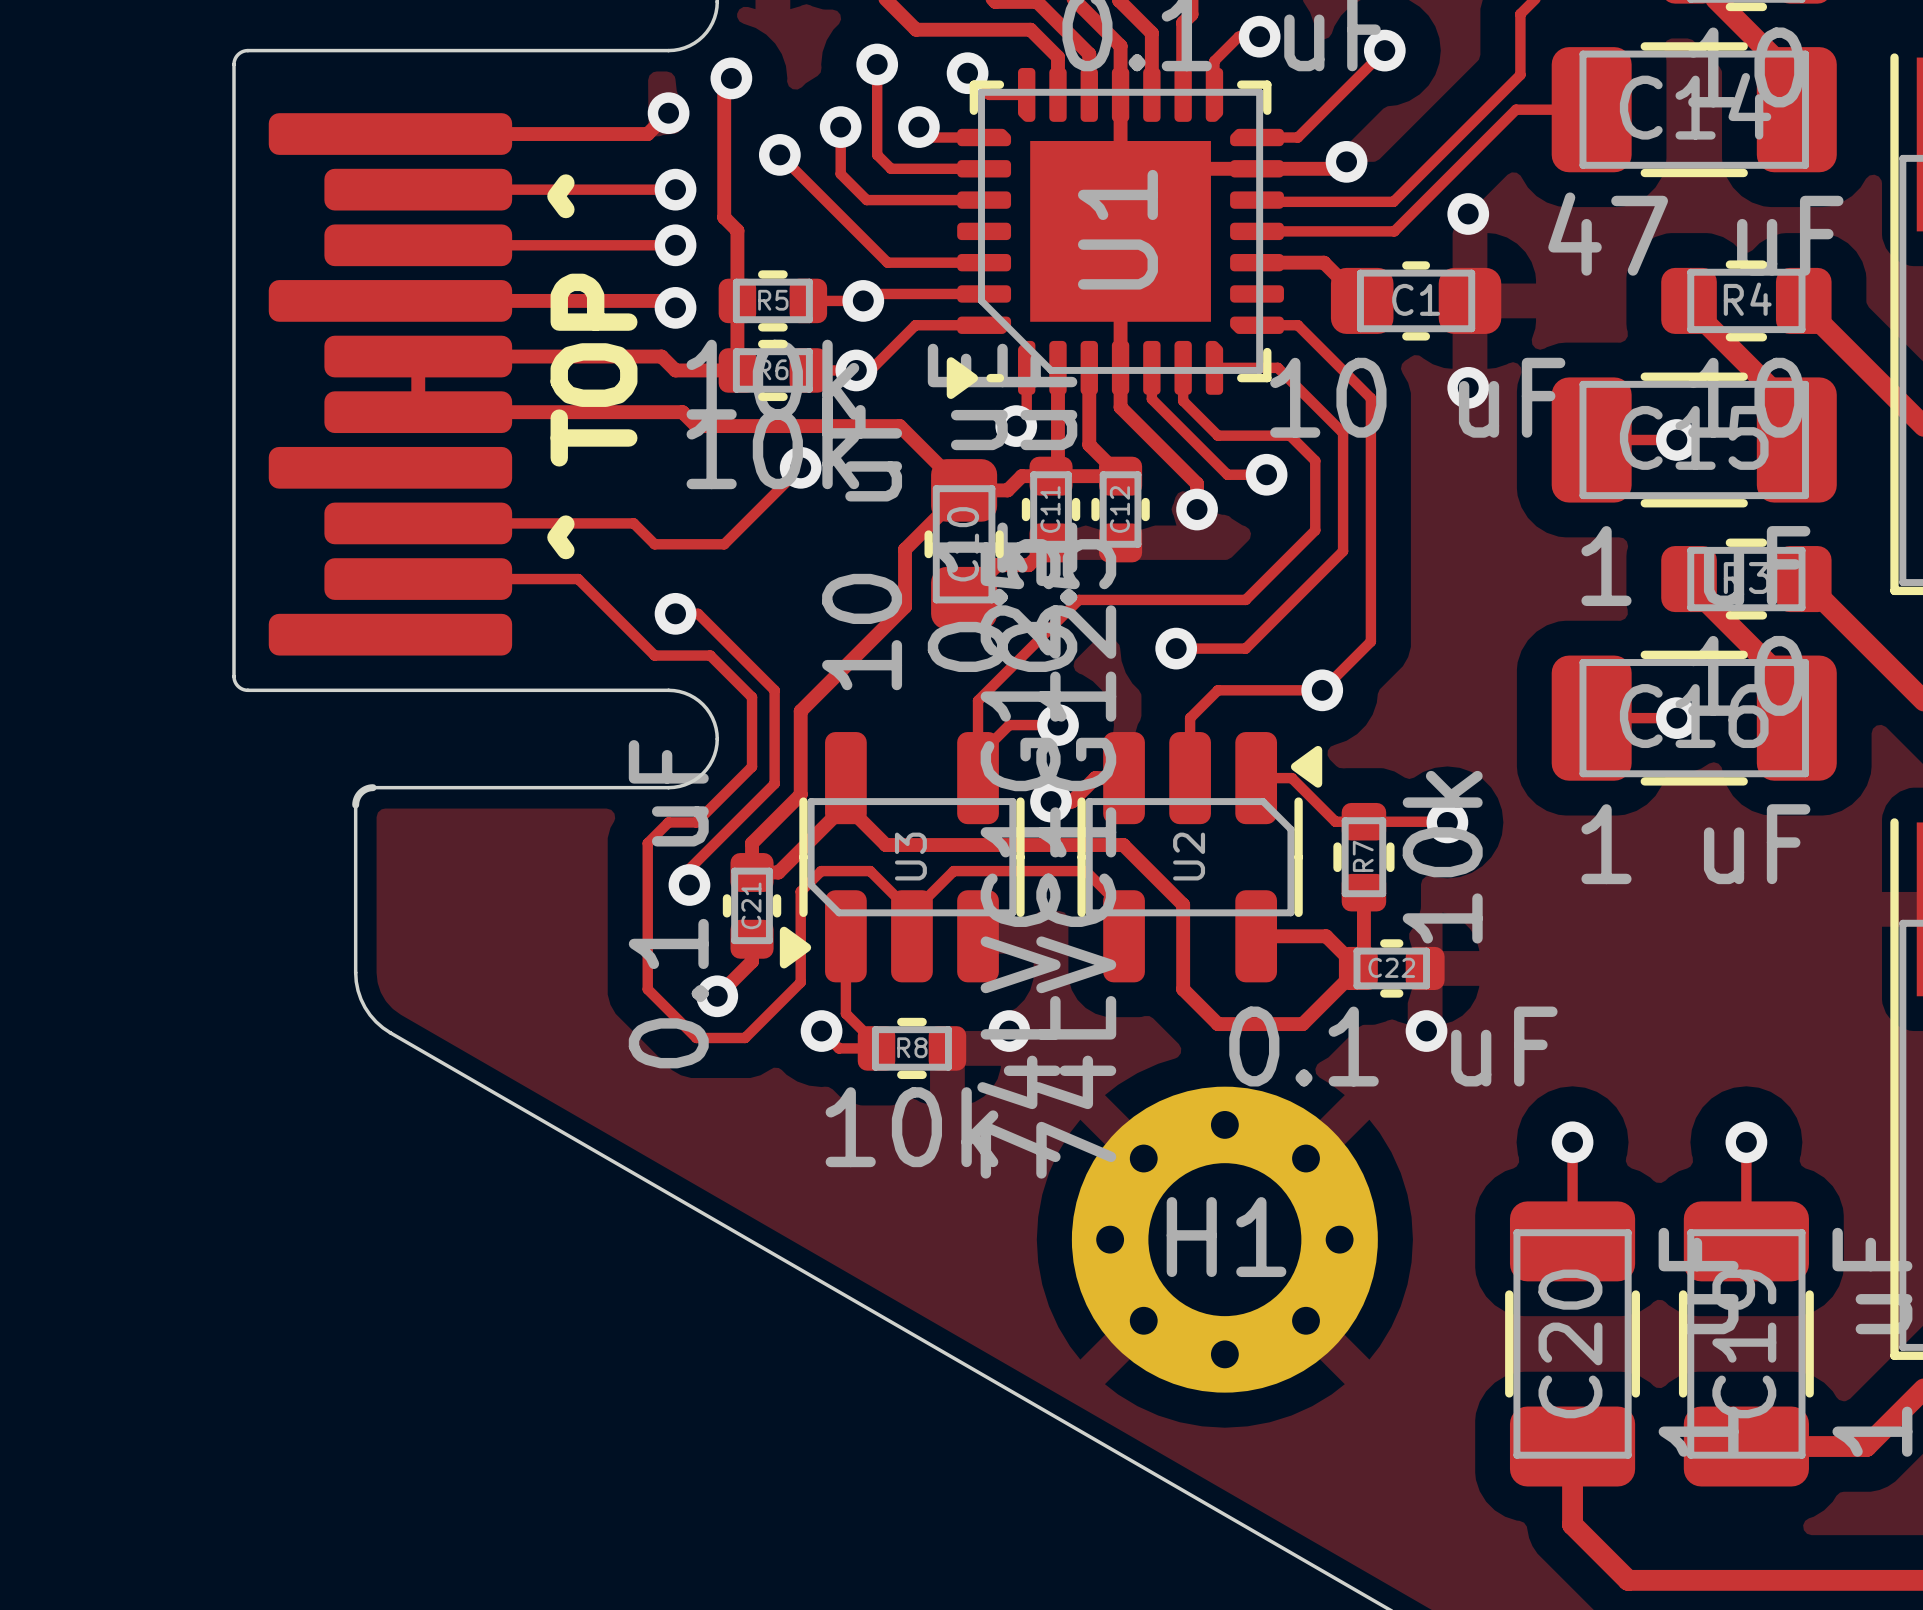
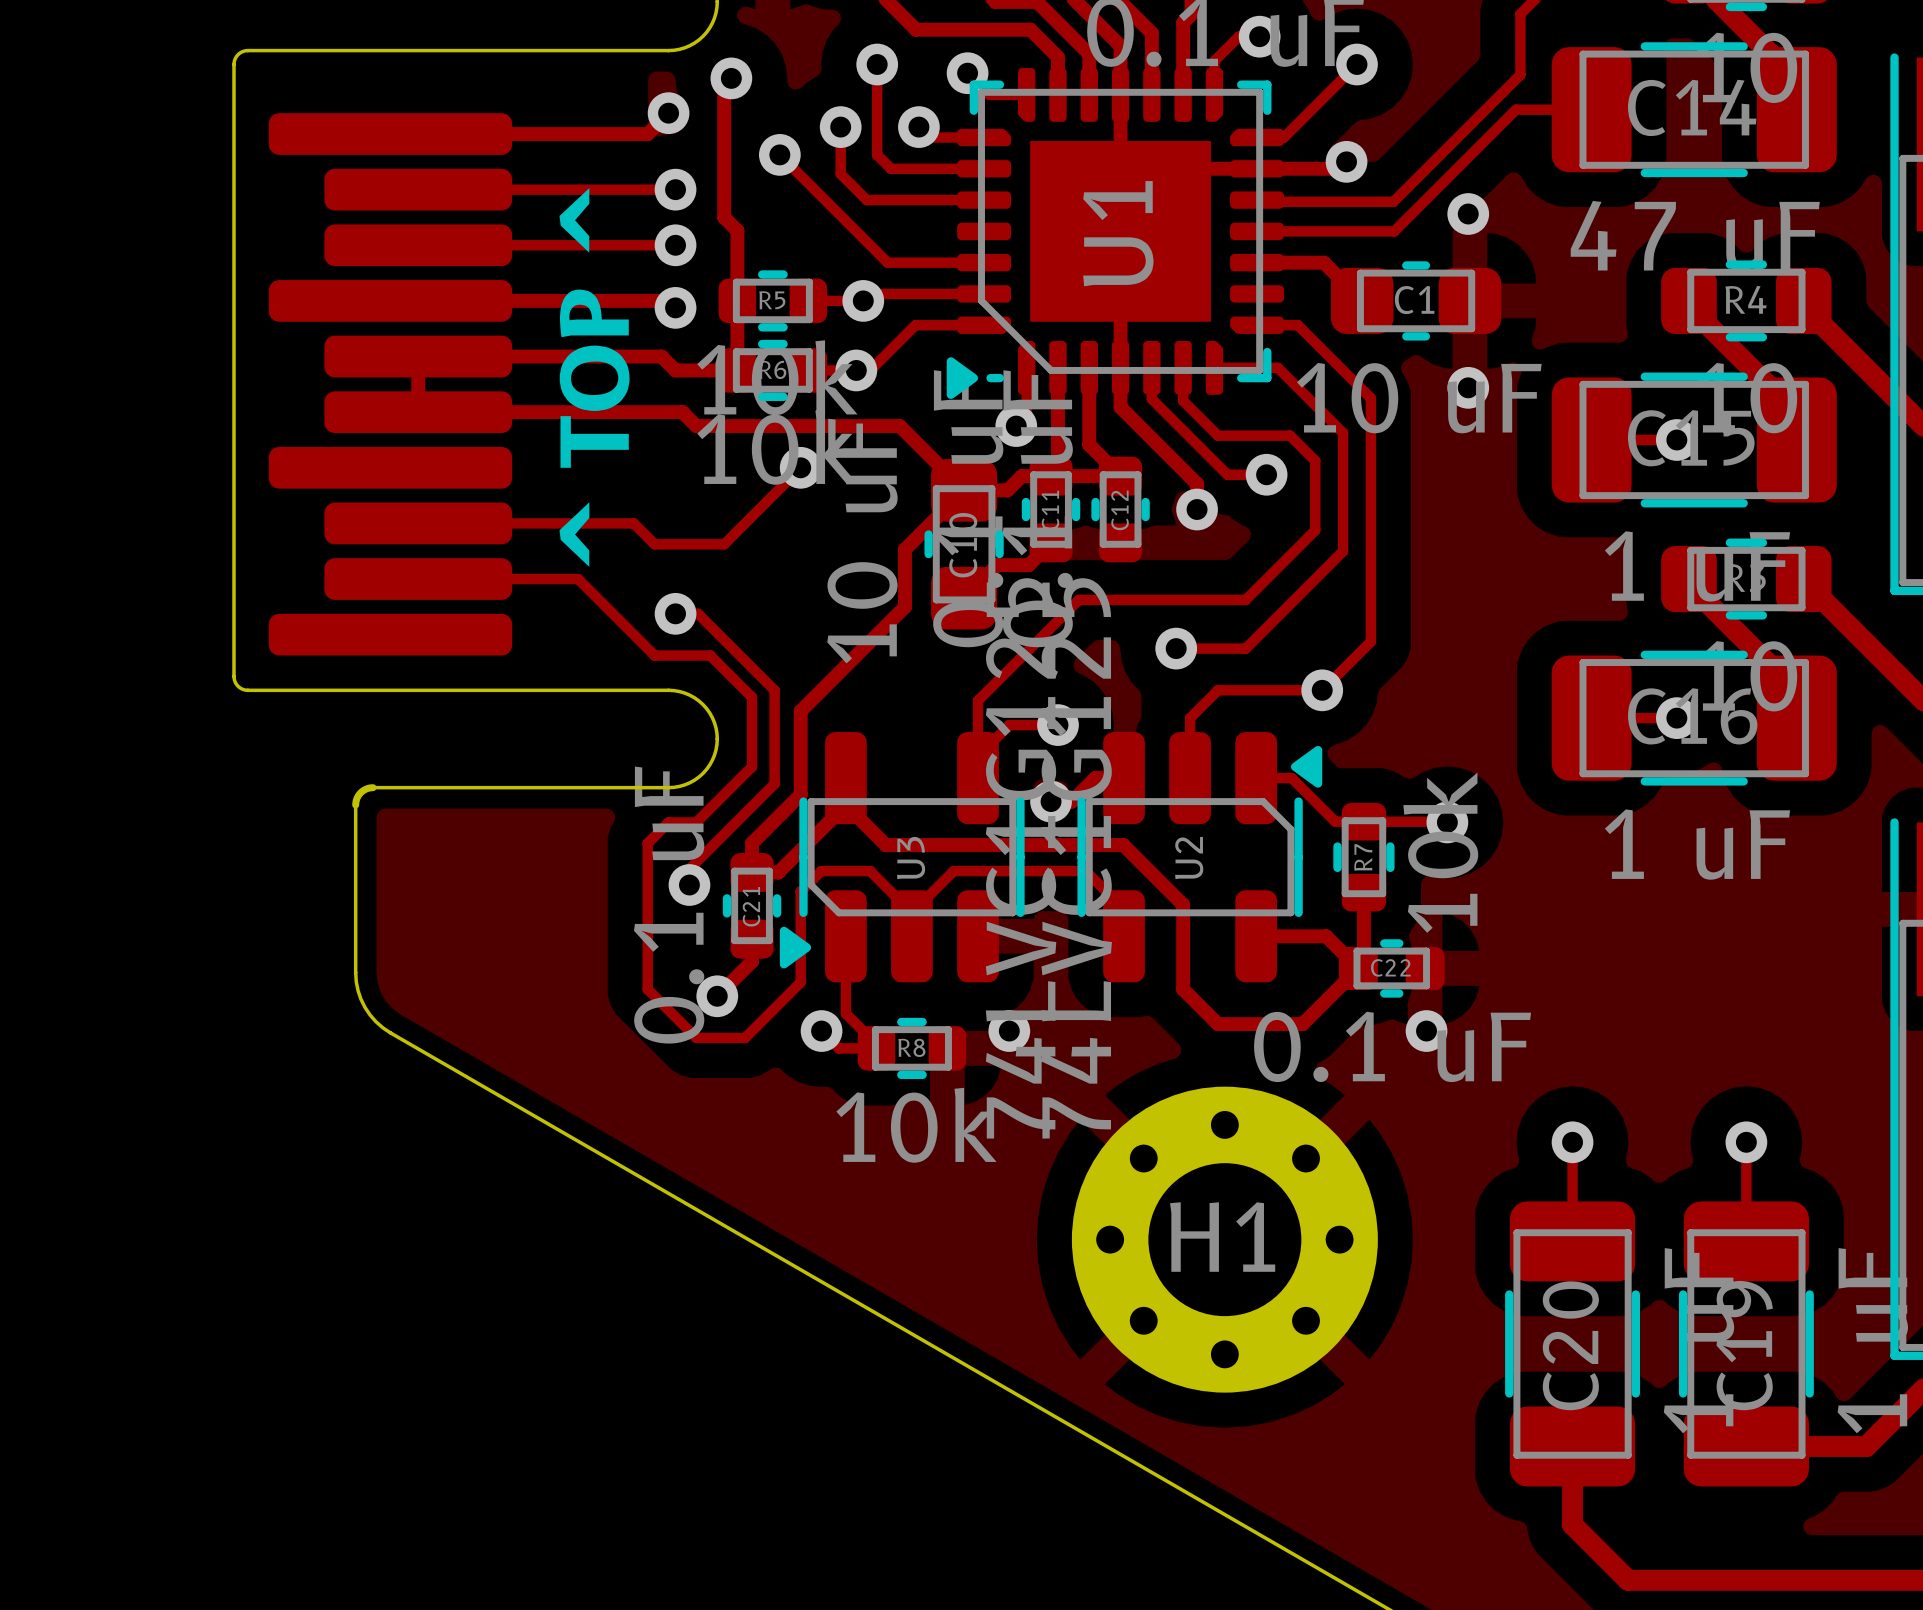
track: (1384, 50) (1297, 137) (1283, 137) -> (1356, 64) (1283, 137)
via position: (1384, 50) -> (1356, 64)

